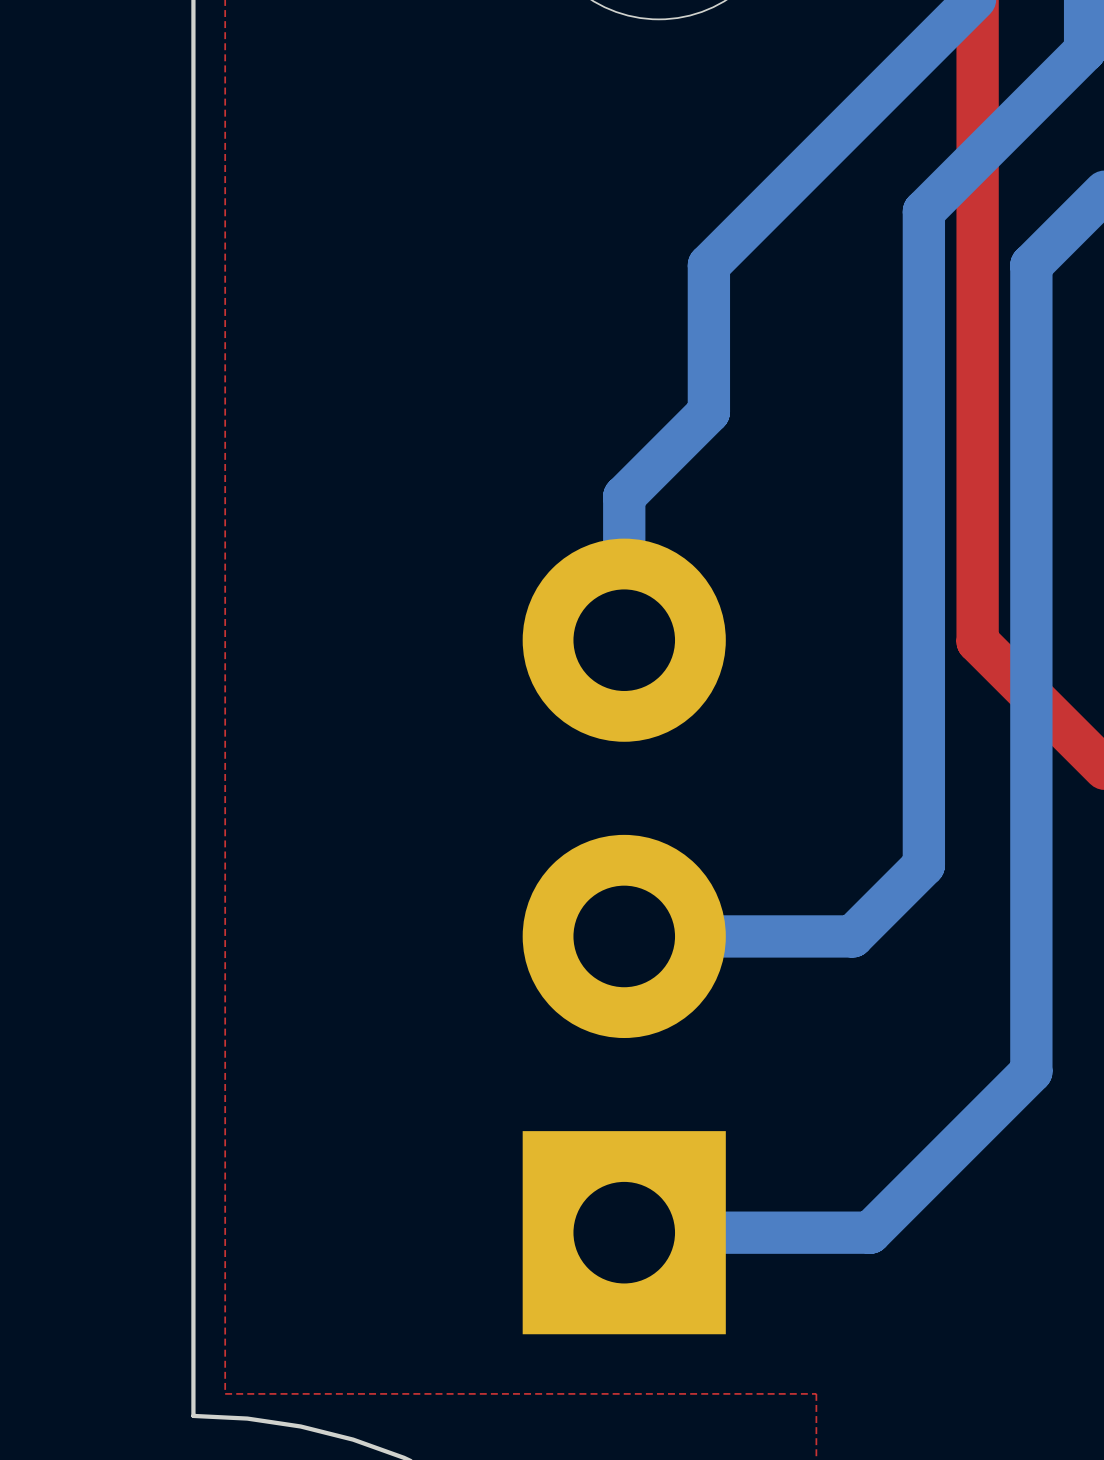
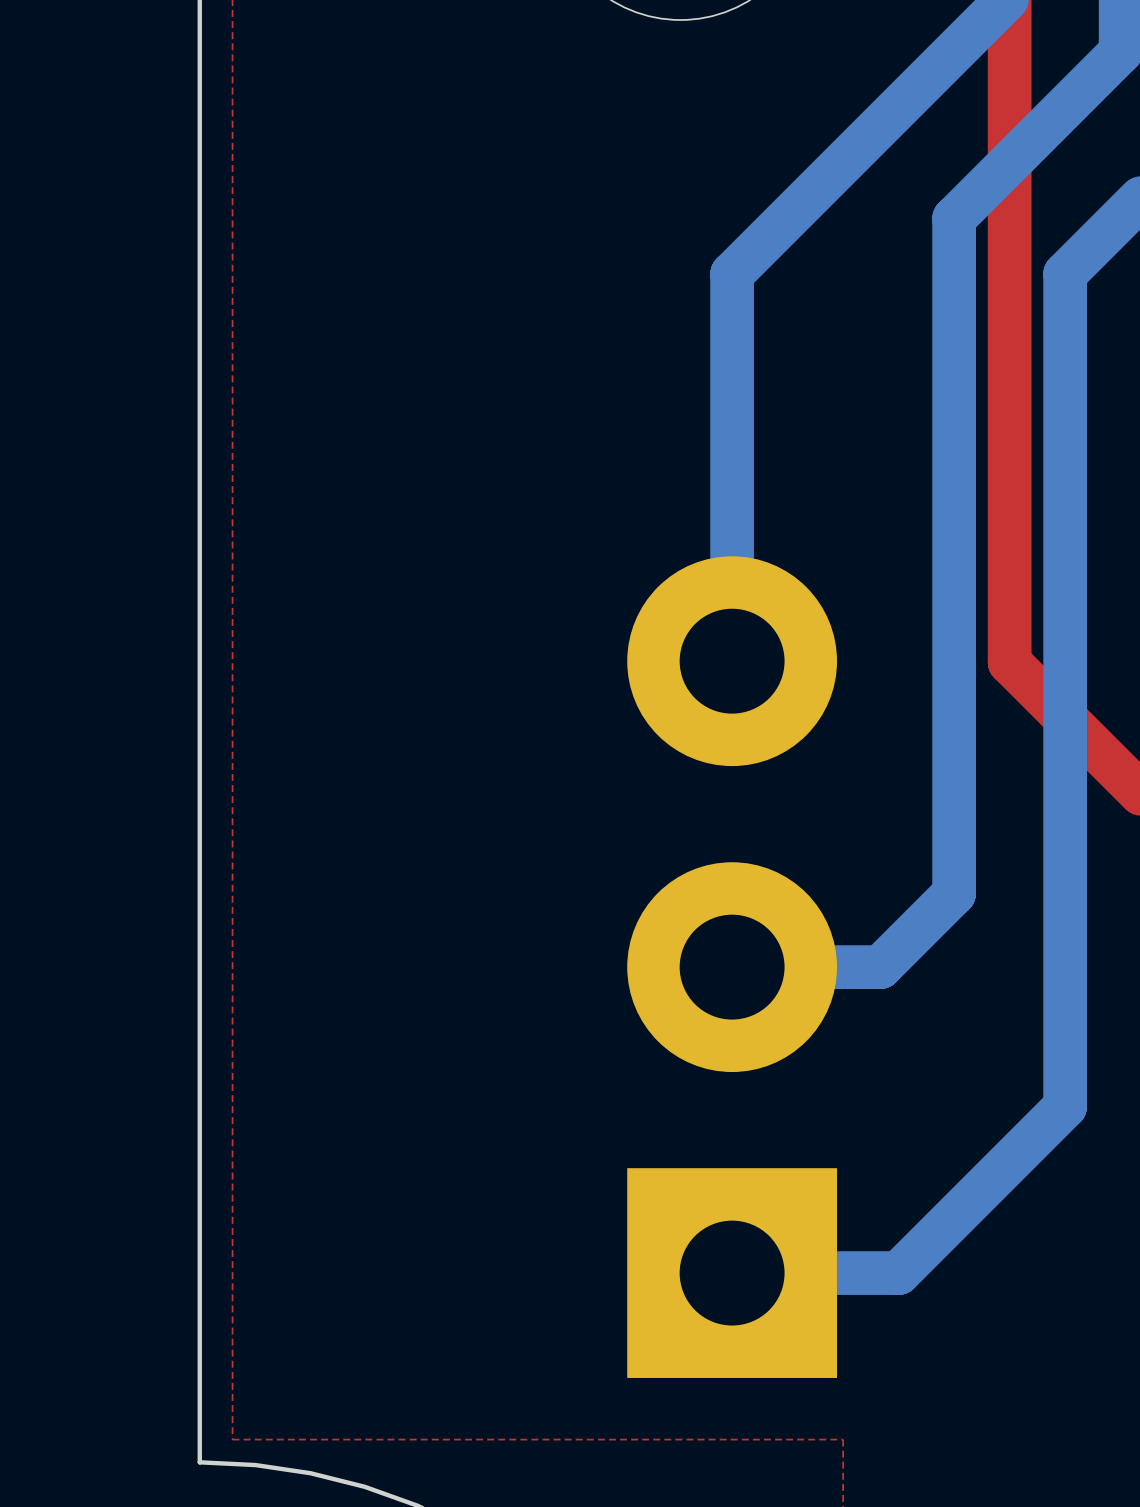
bottom track: (708, 411) (624, 496) (624, 640) -> (732, 425) (732, 661)
part position: (624, 936) -> (732, 967)

